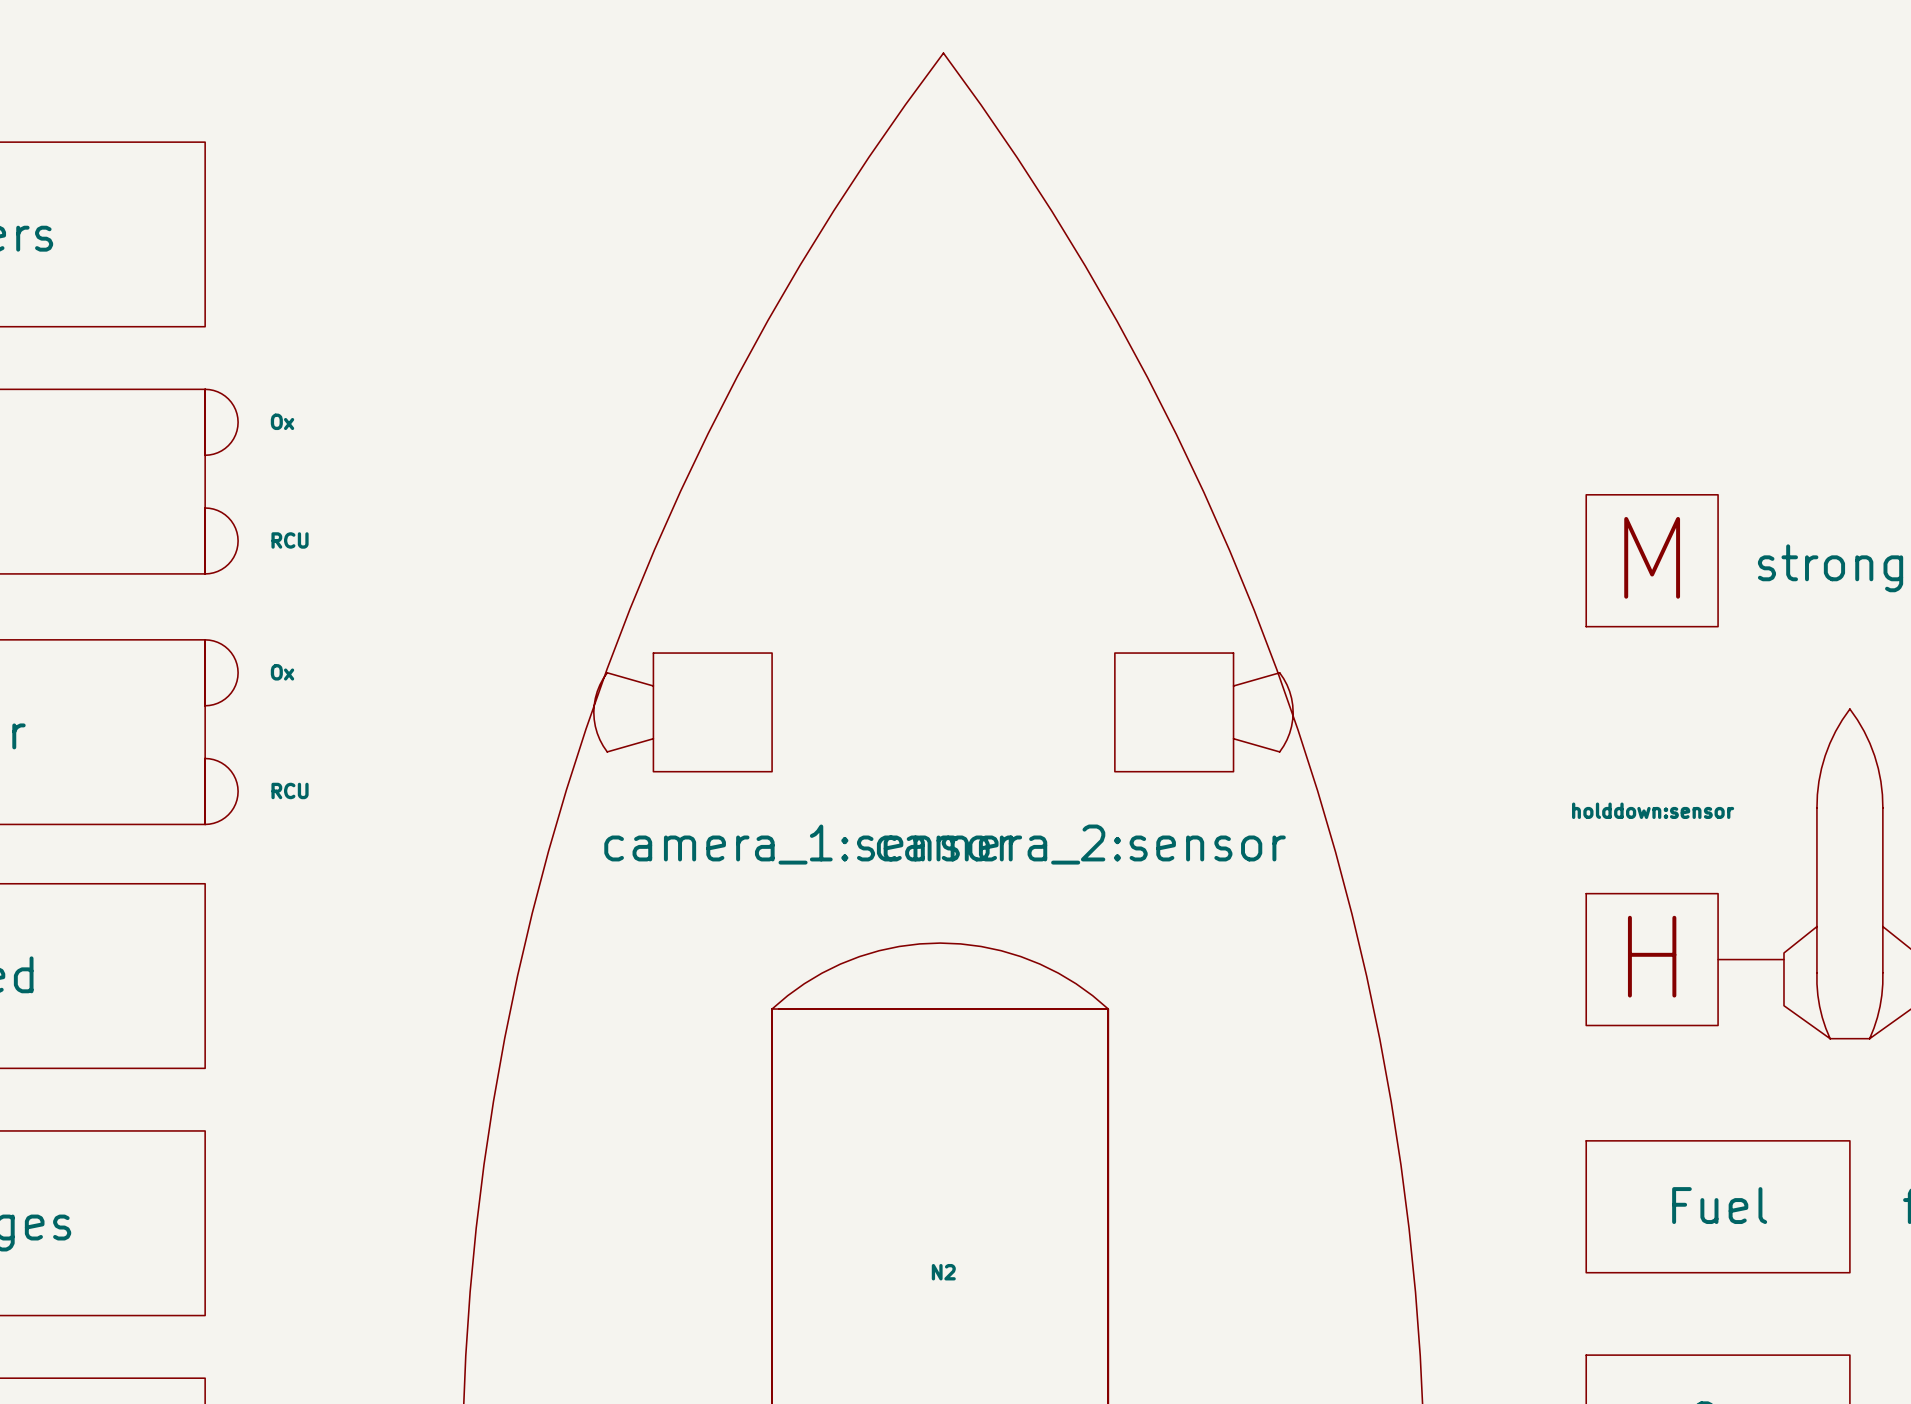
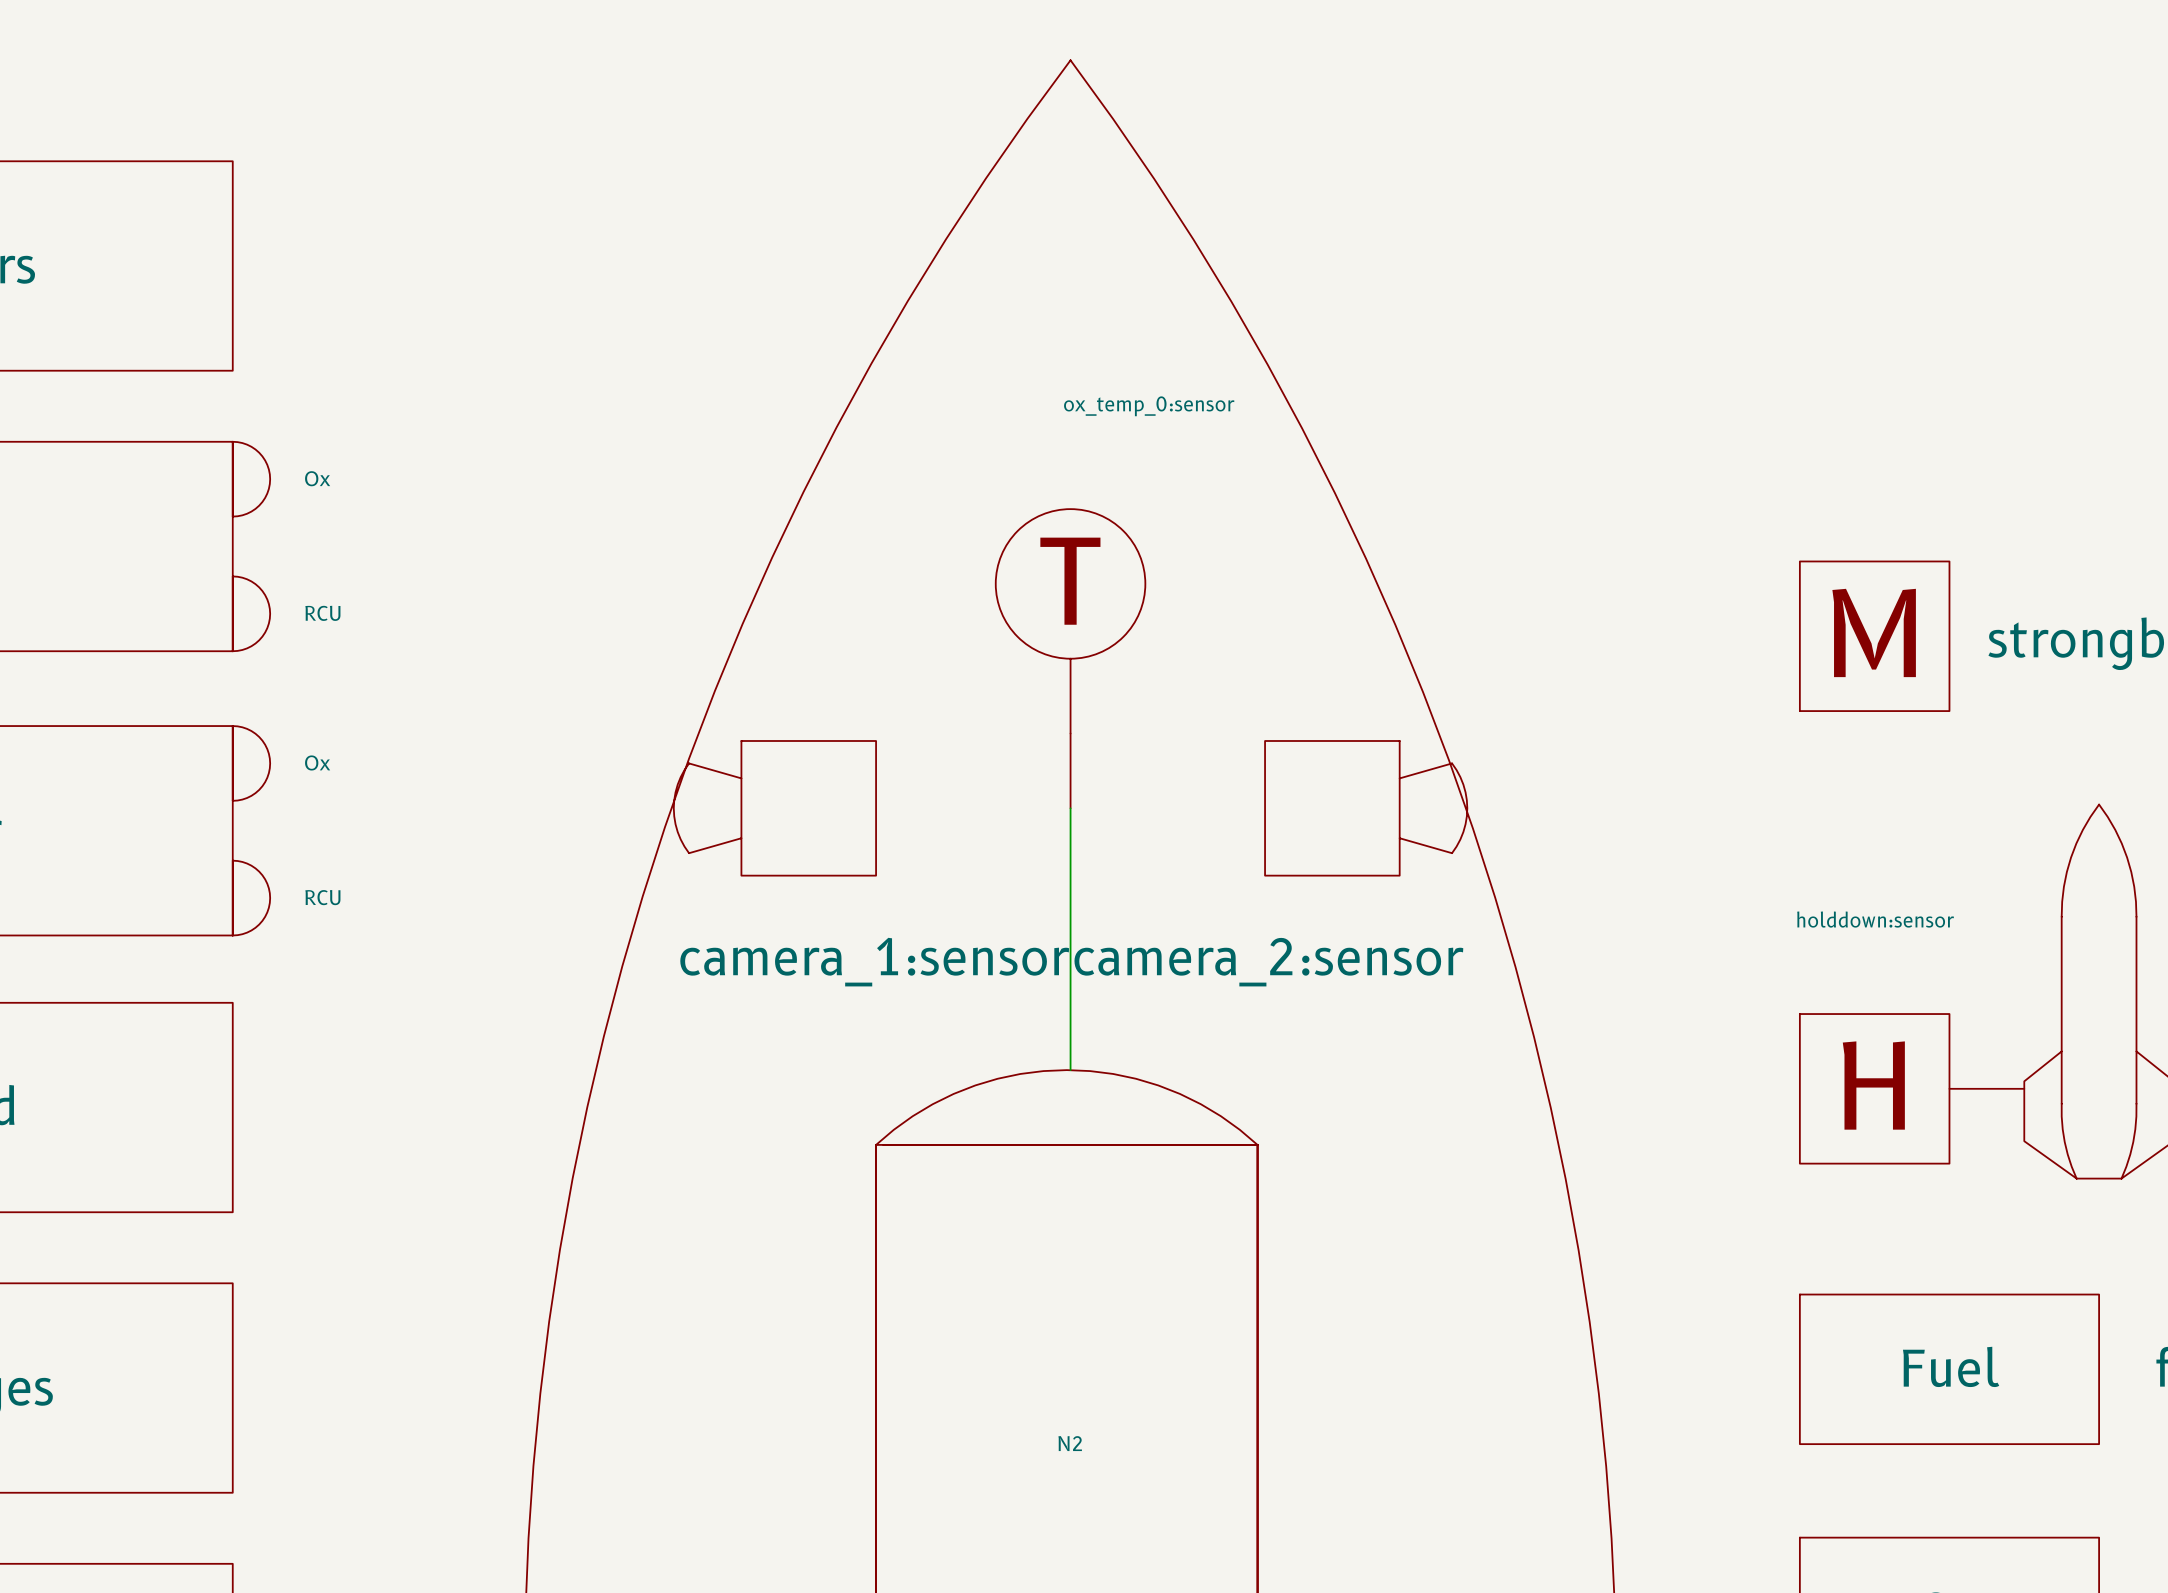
part: none -> ox_temp_0:sensor (1070, 658)
wire: none -> (1070, 808) (1070, 1070)

